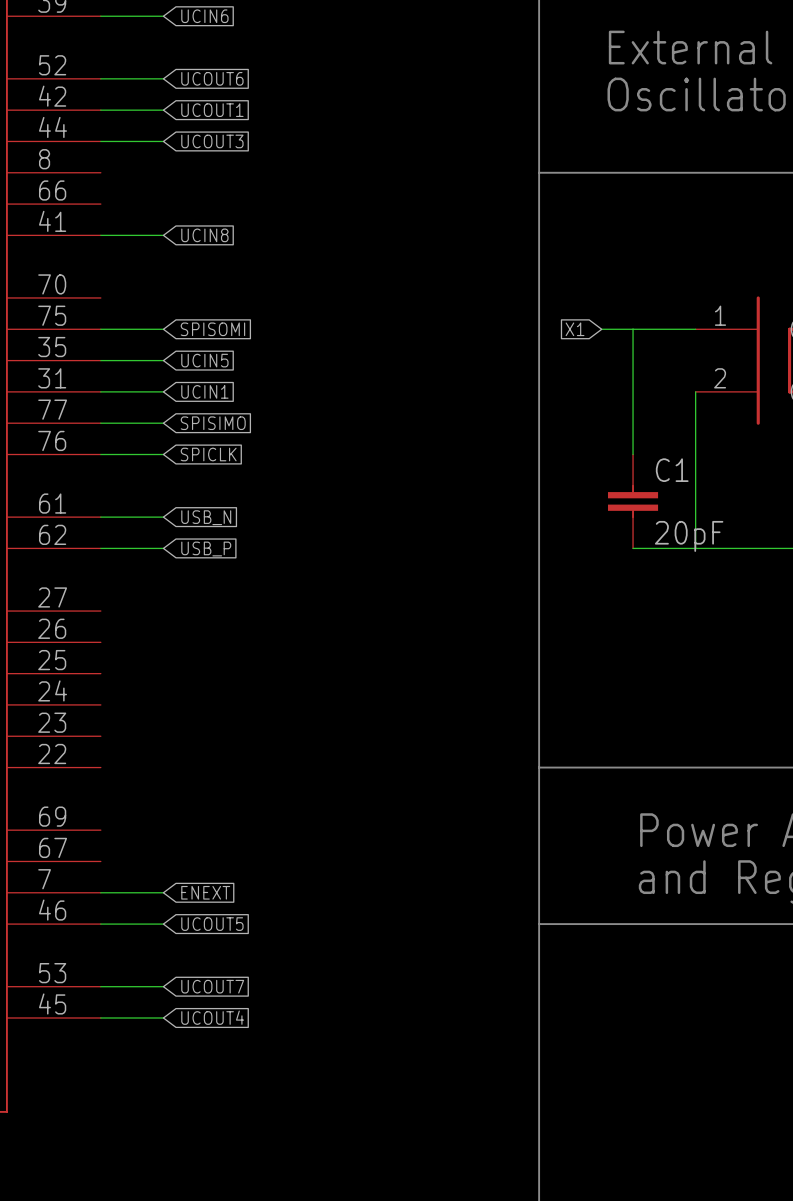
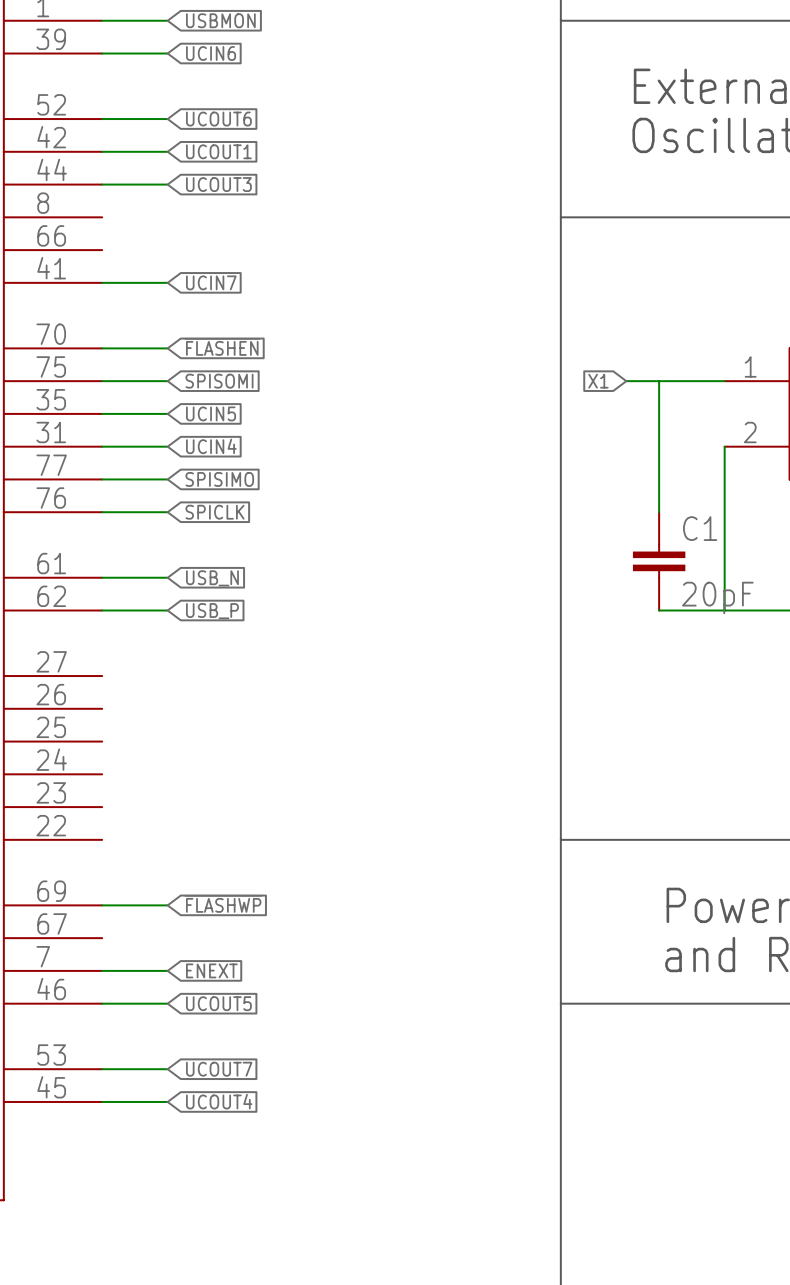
global label: UCIN8 (204, 235) -> UCIN7 (211, 282)
global label: none -> ~{FLASHEN} (222, 346)
wire: none -> (102, 348) (167, 348)
global label: UCIN1 (204, 391) -> UCIN4 (211, 446)
global label: none -> ~{FLASHWP} (223, 903)
wire: none -> (102, 905) (167, 905)

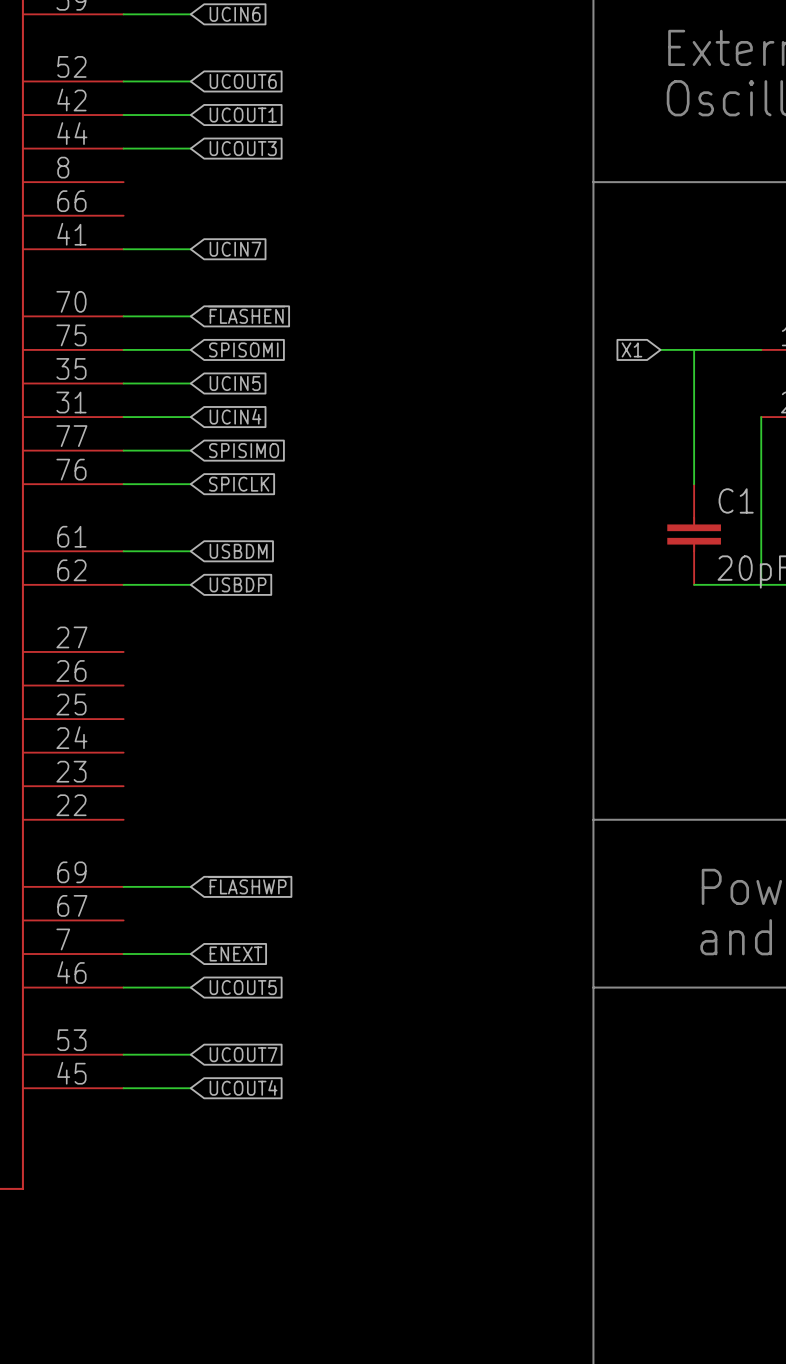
global label: USB_N (212, 578) -> USBDM (238, 551)
global label: USB_P (212, 611) -> USBDP (238, 584)

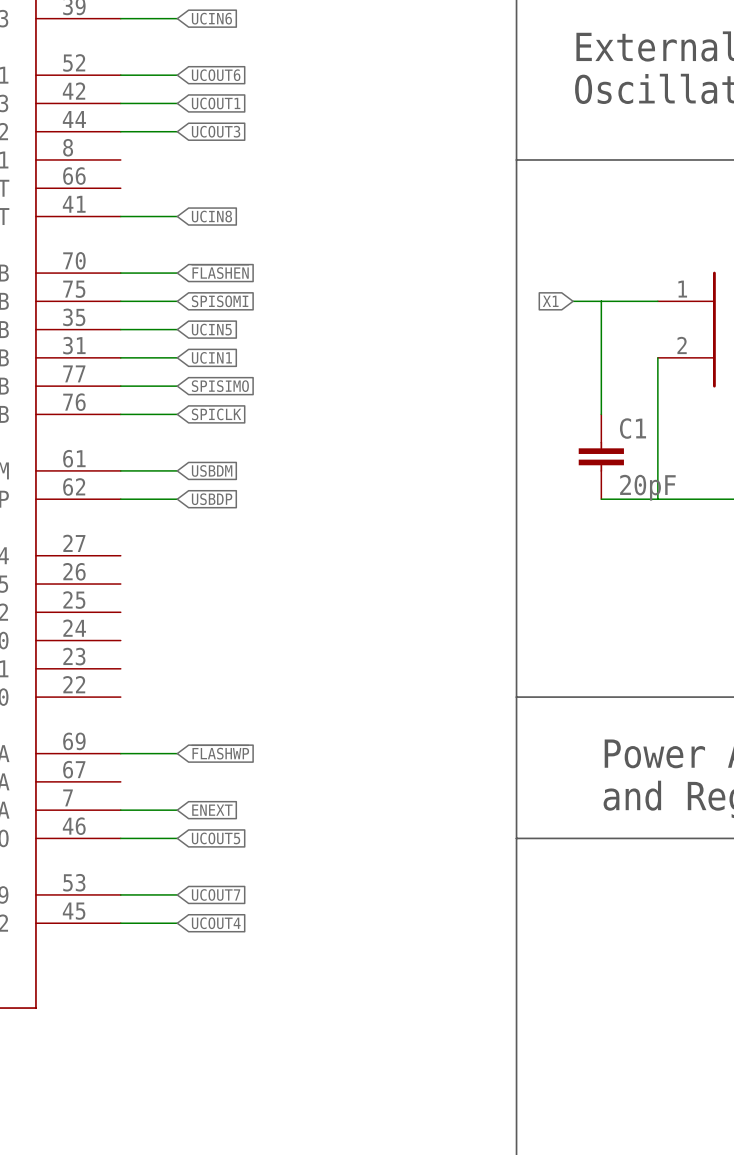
global label: UCIN7 (235, 249) -> UCIN8 (211, 216)
global label: UCIN4 (235, 416) -> UCIN1 (211, 357)

